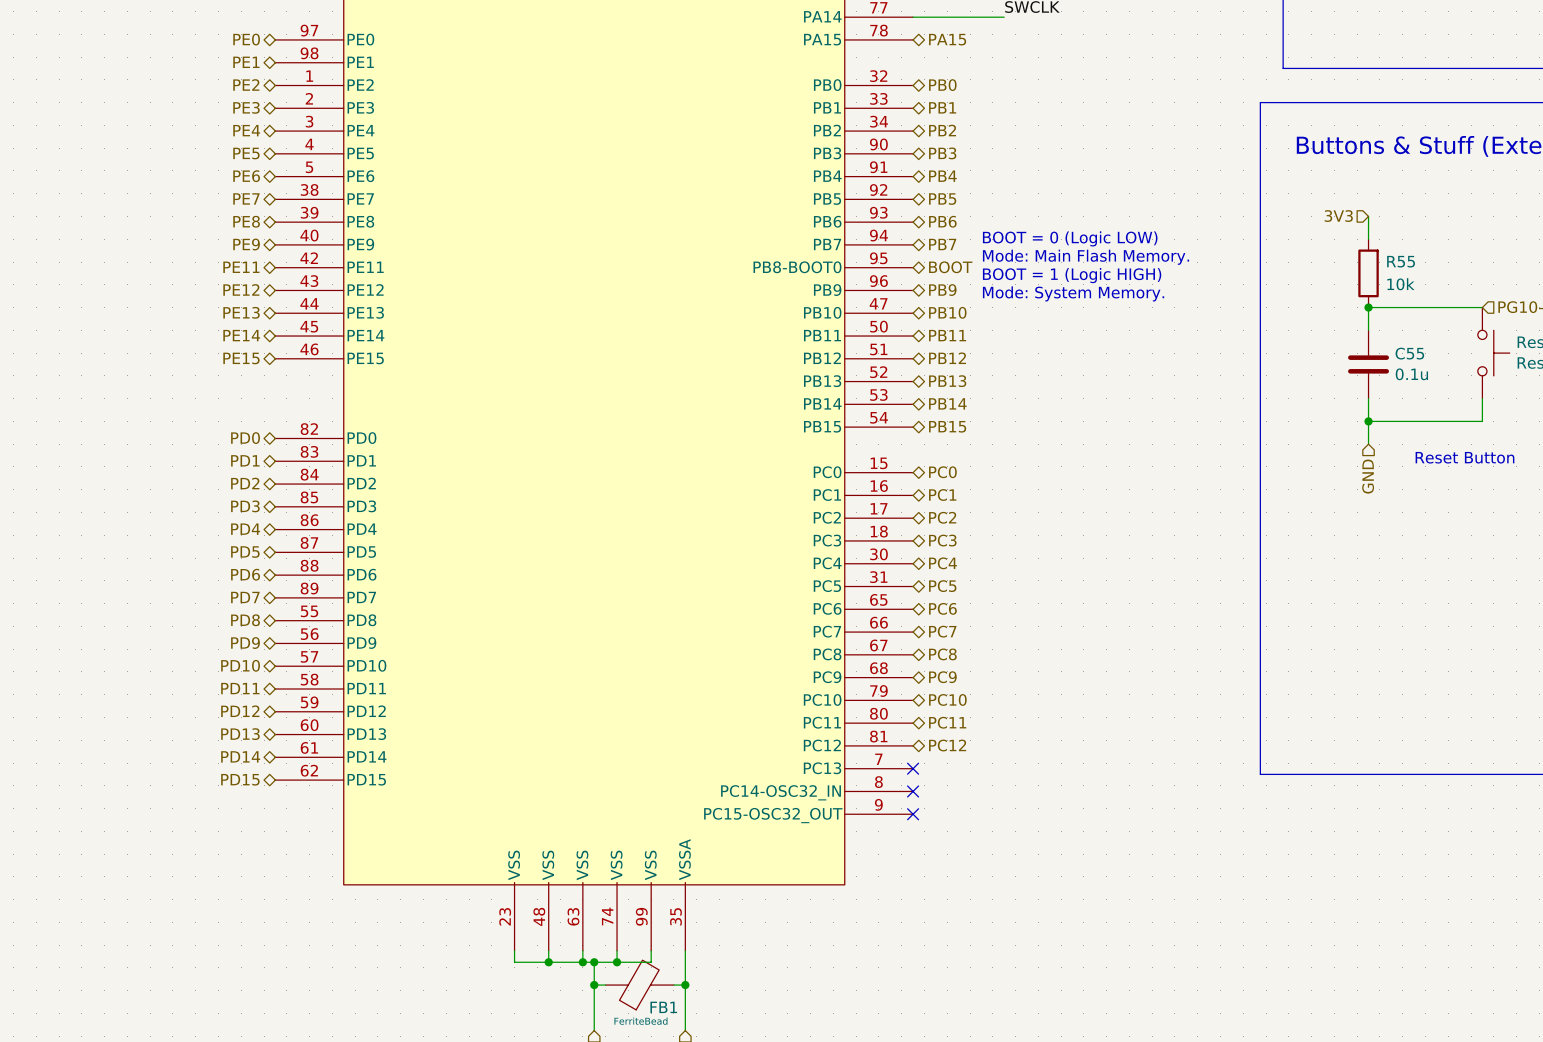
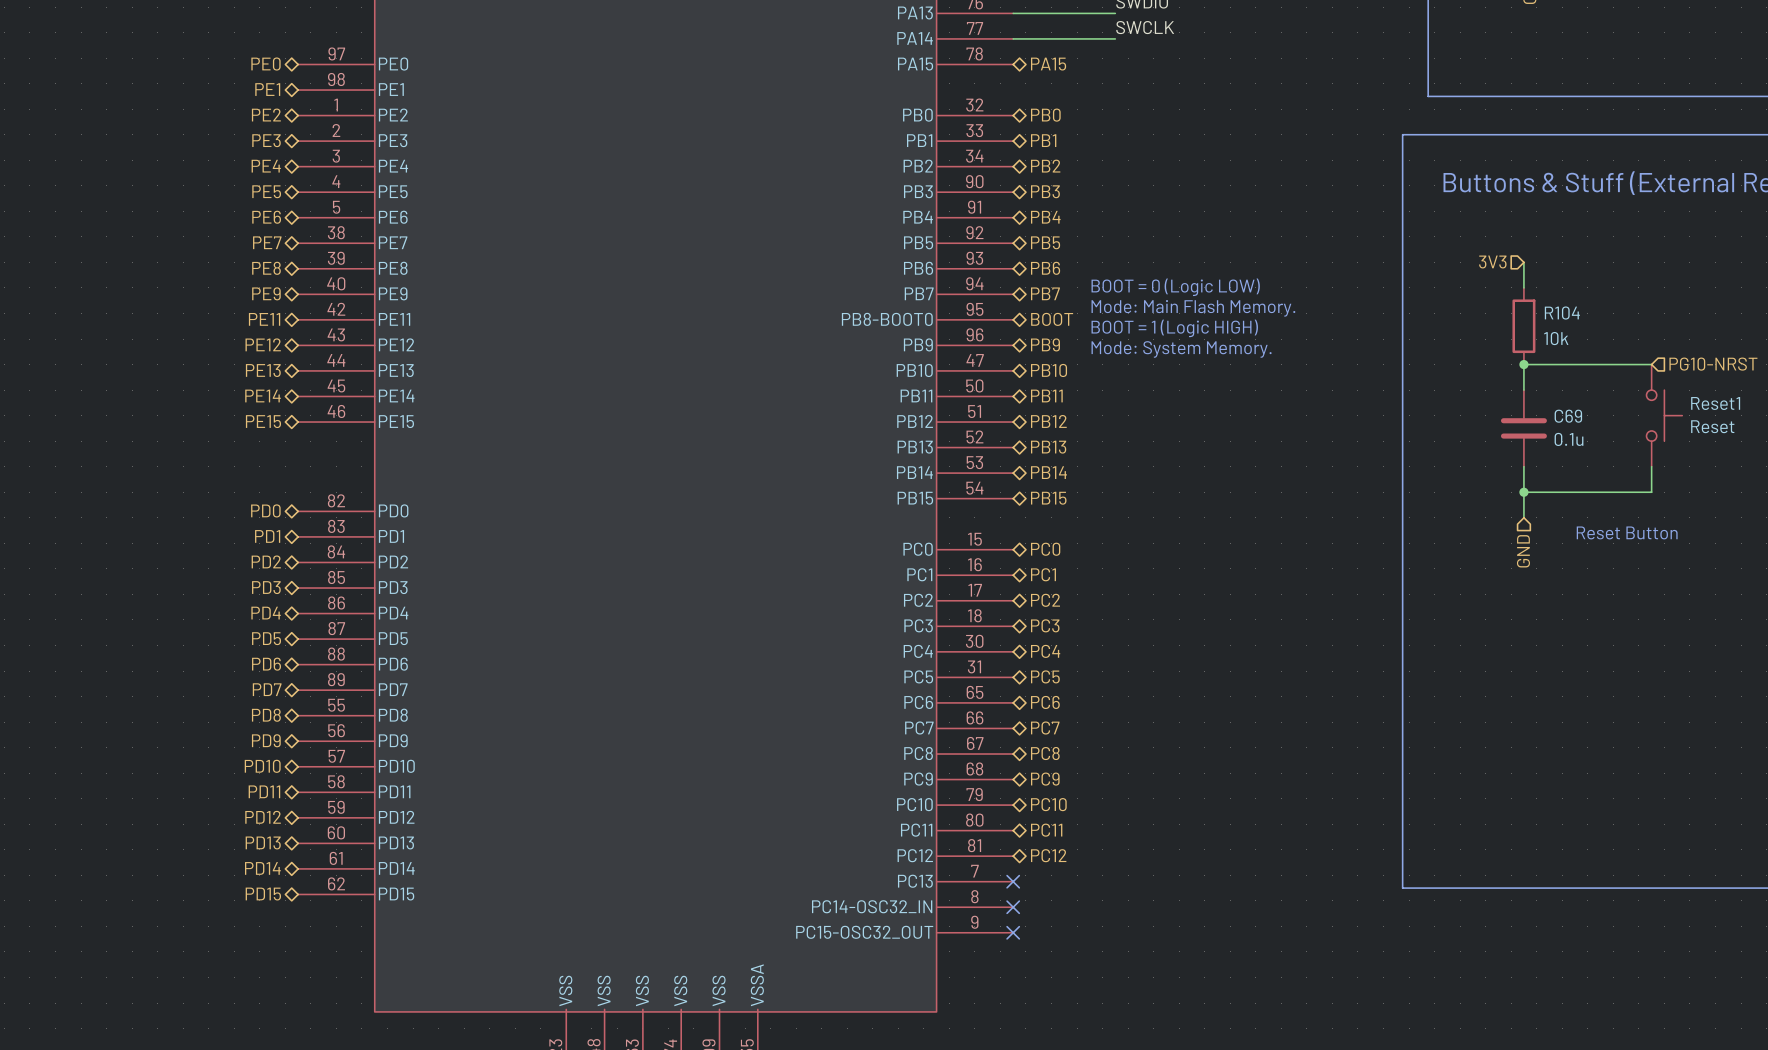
R55 name: R55 (1401, 261) -> R104 (1562, 313)
C55 name: C55 (1409, 353) -> C69 (1568, 416)

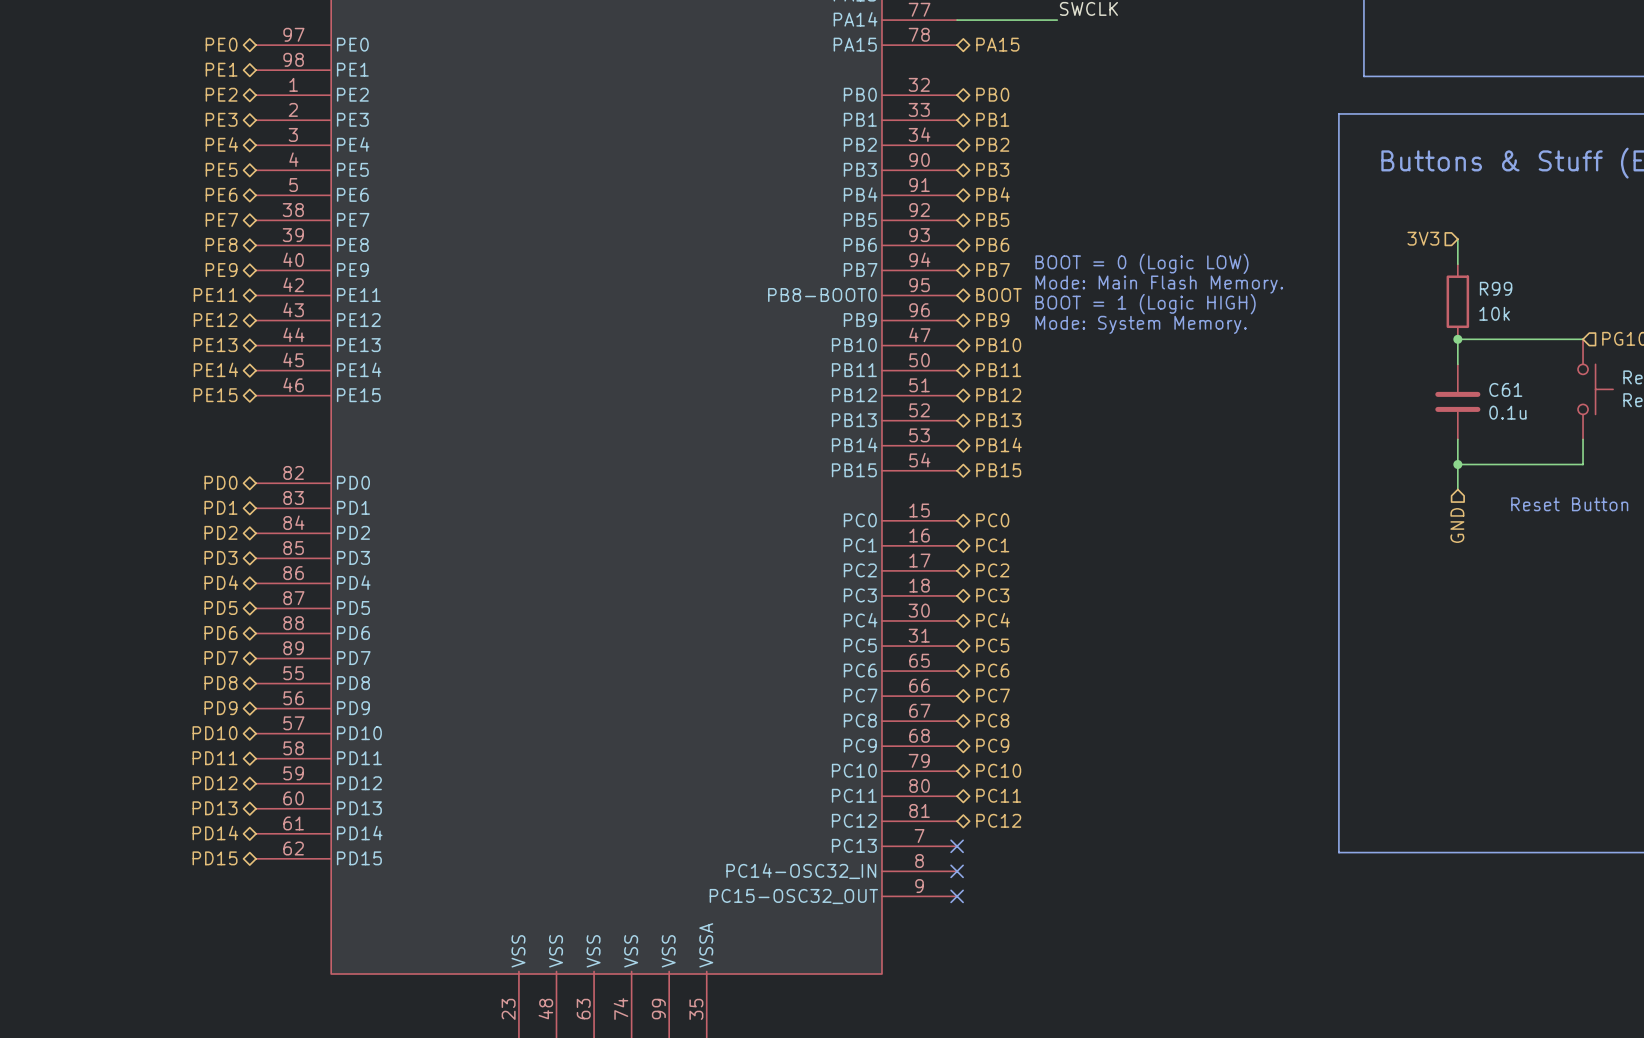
R104 name: R104 (1562, 313) -> R99 (1496, 288)
C69 name: C69 (1568, 416) -> C61 (1505, 389)

